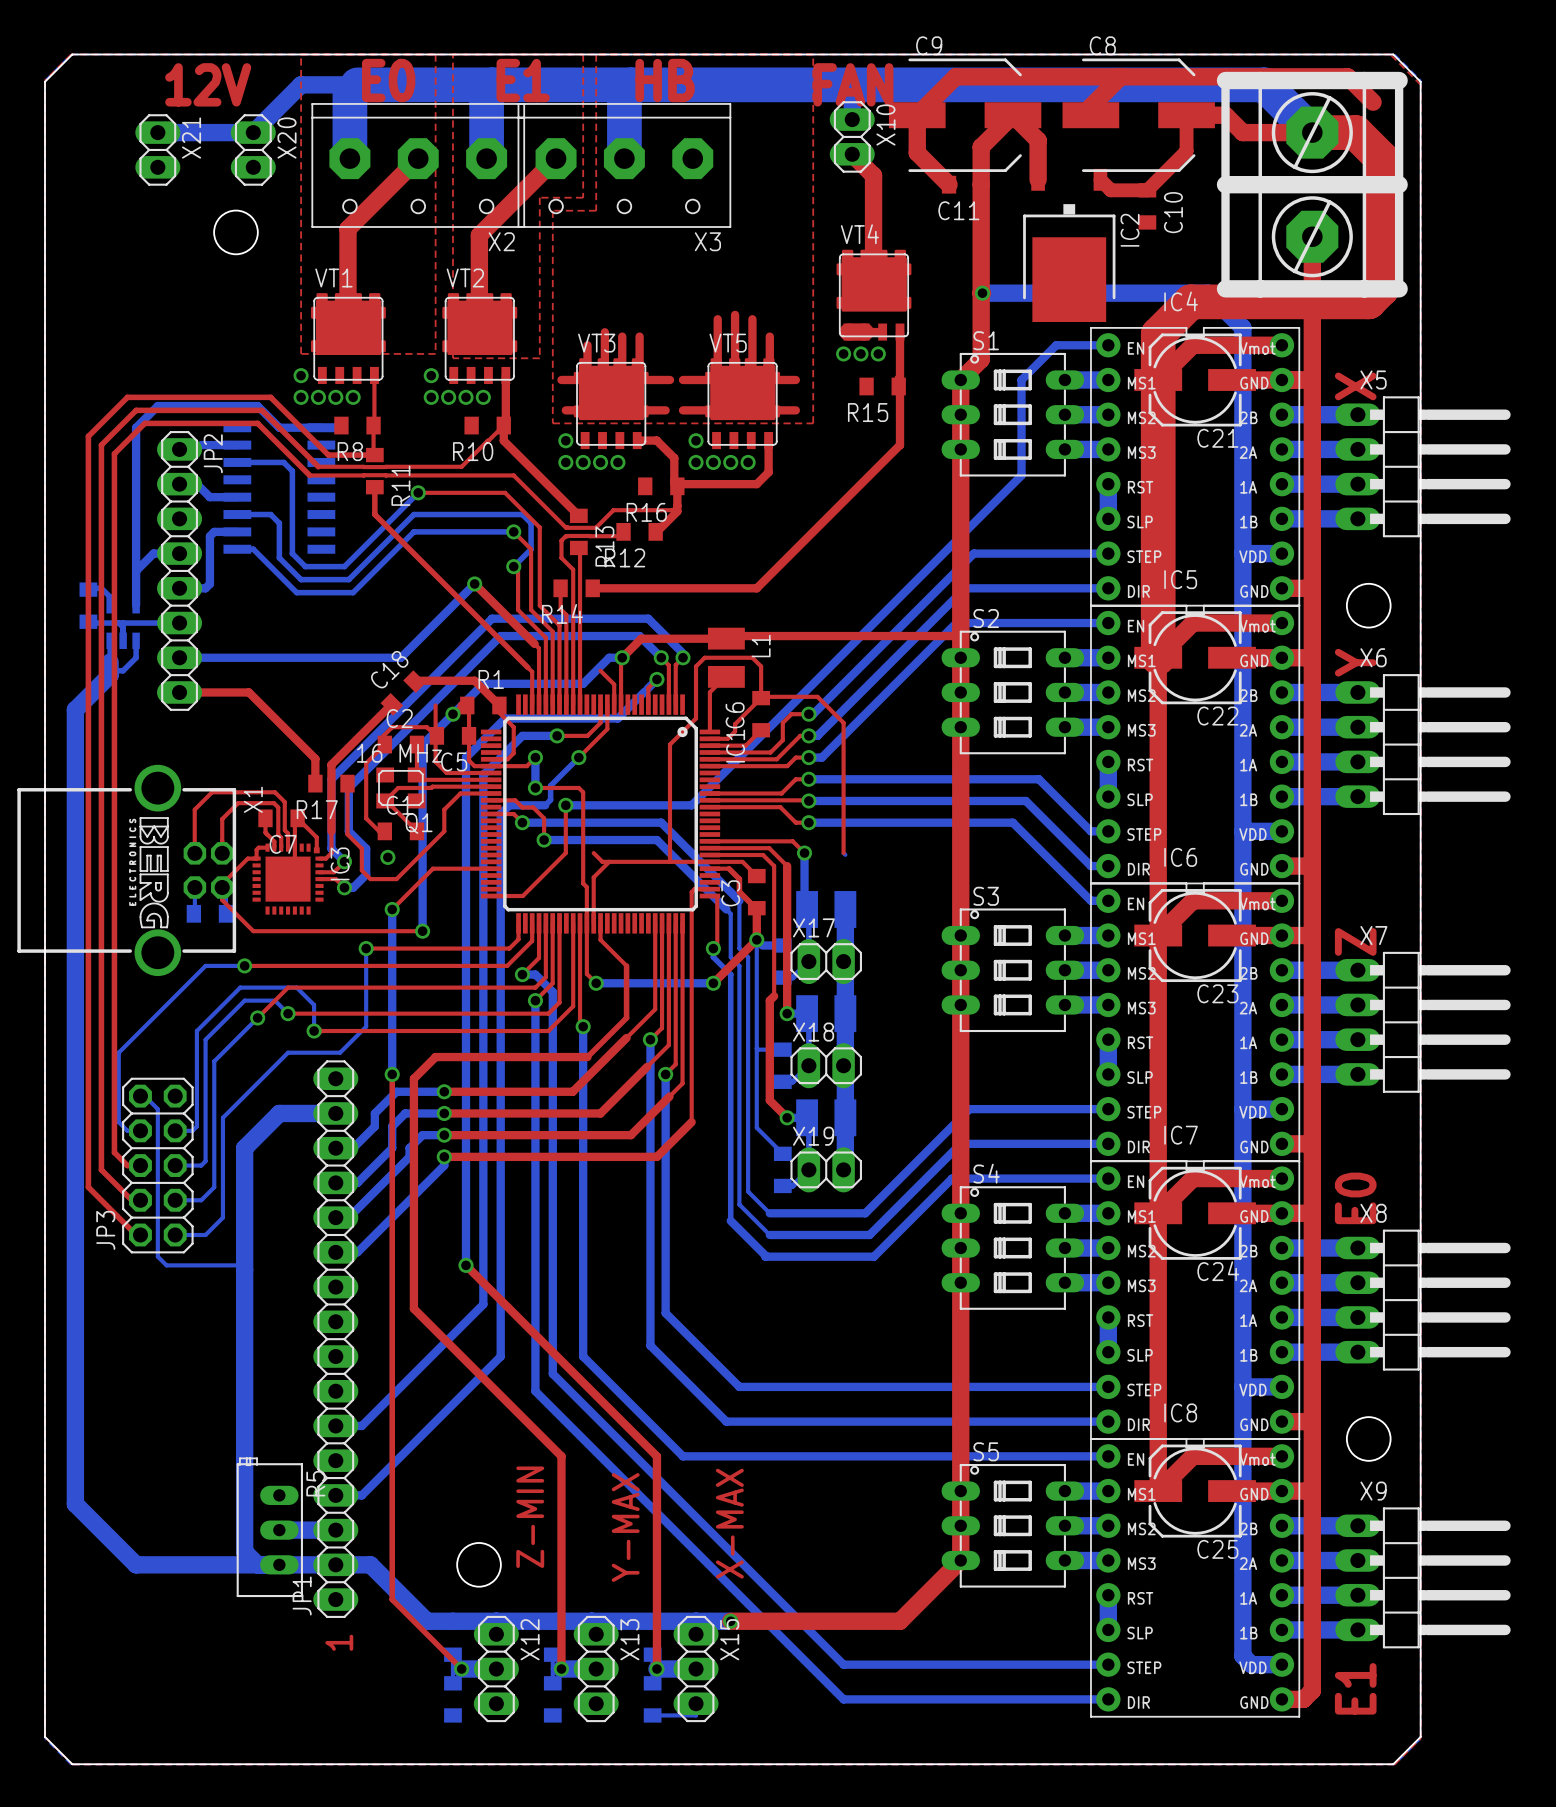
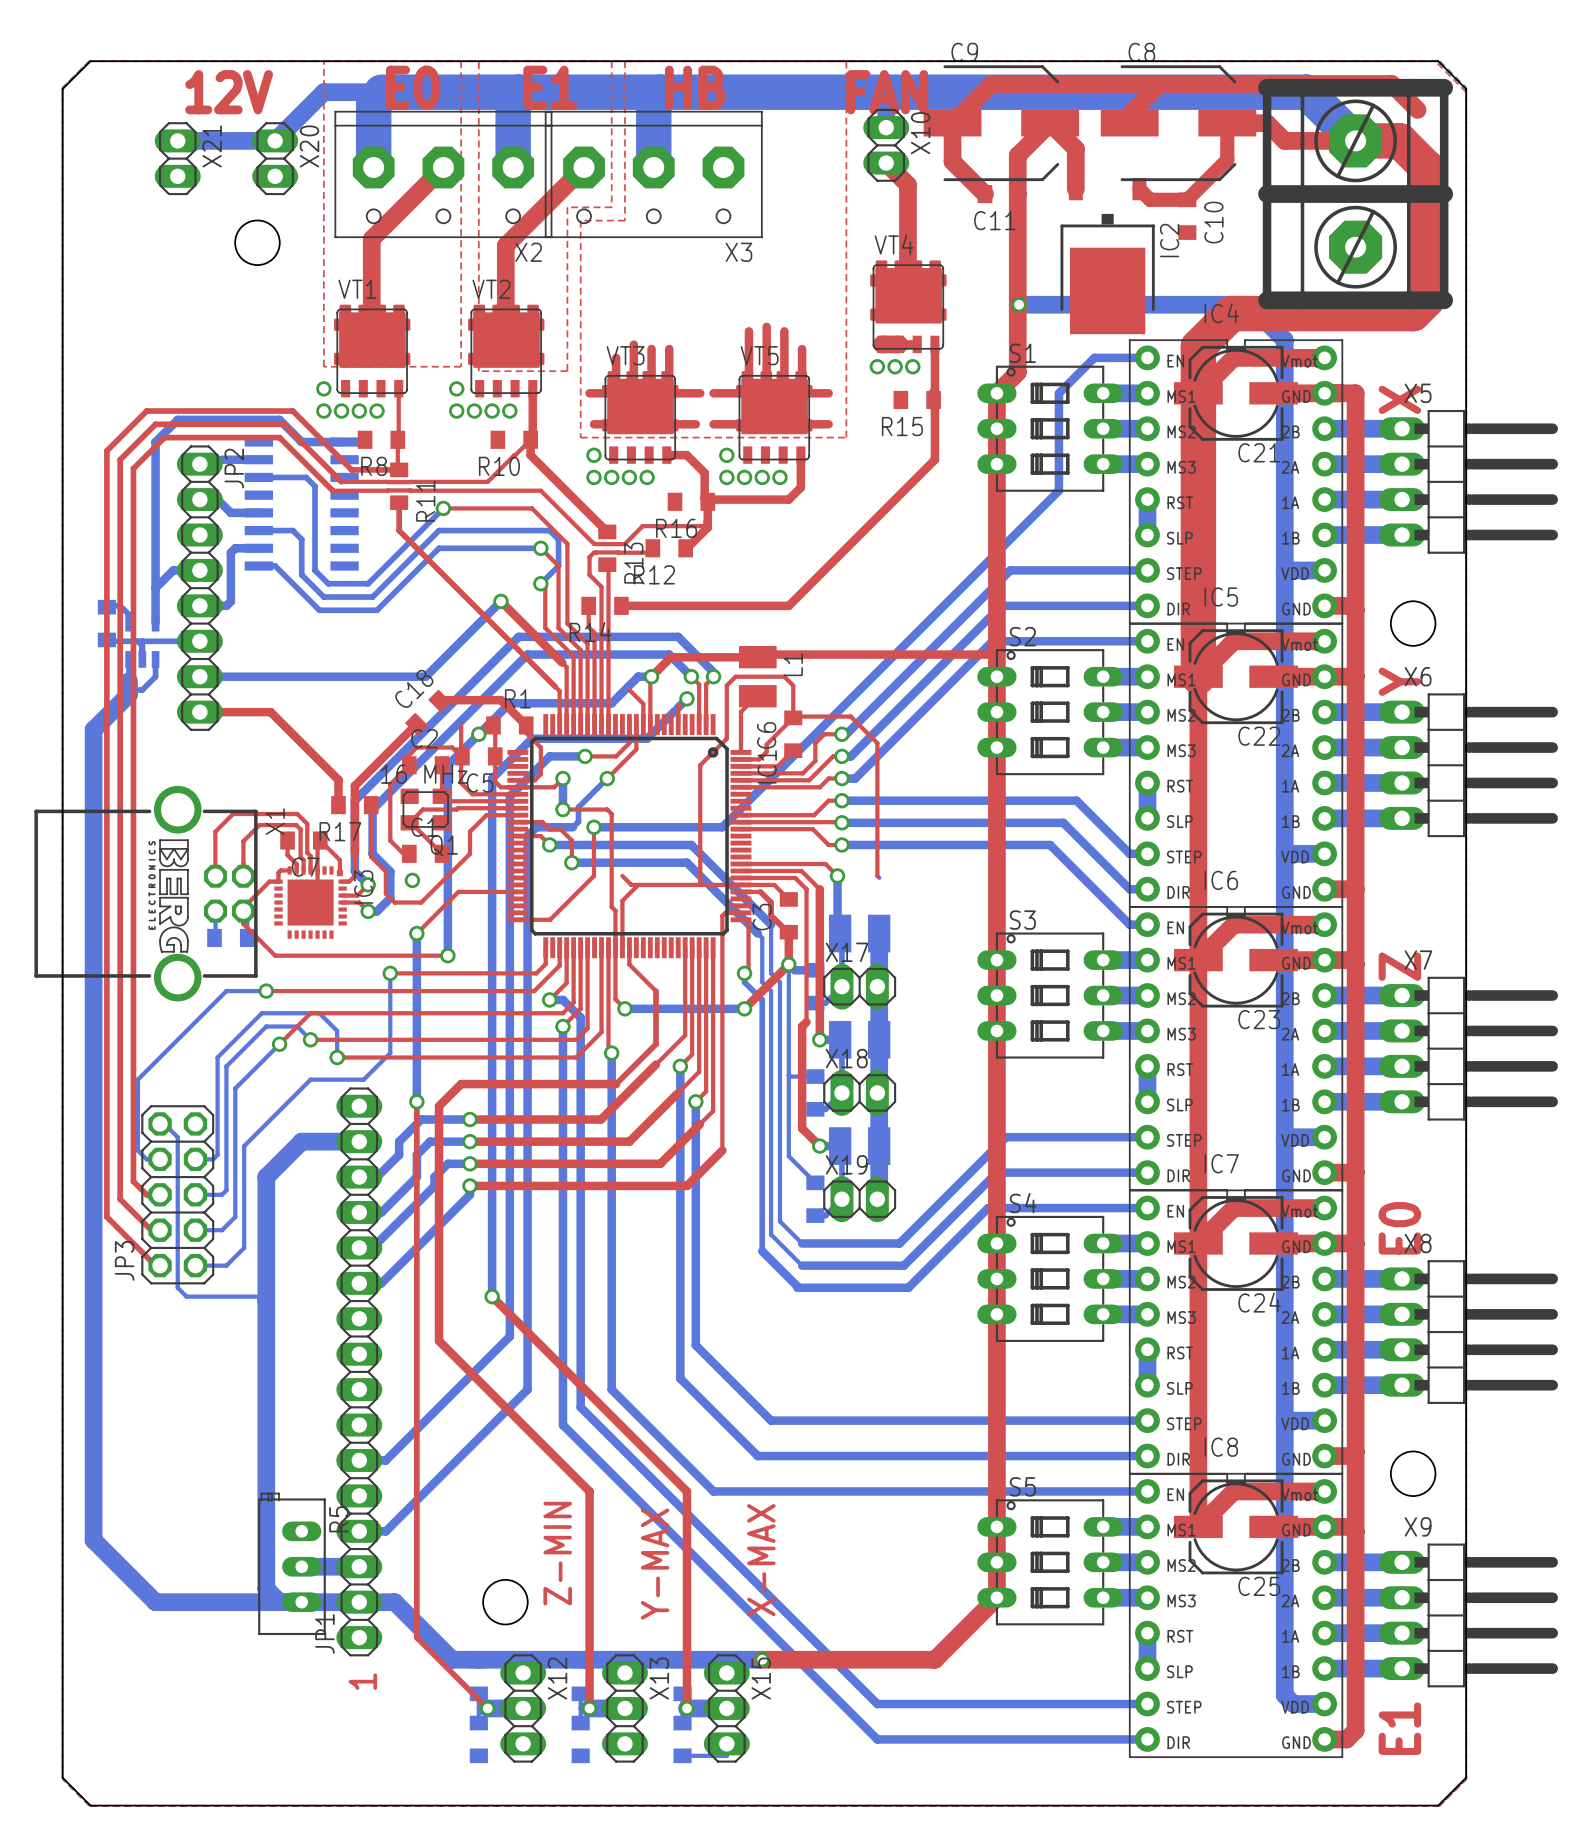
top track: (1312, 236) (1312, 379) -> none

